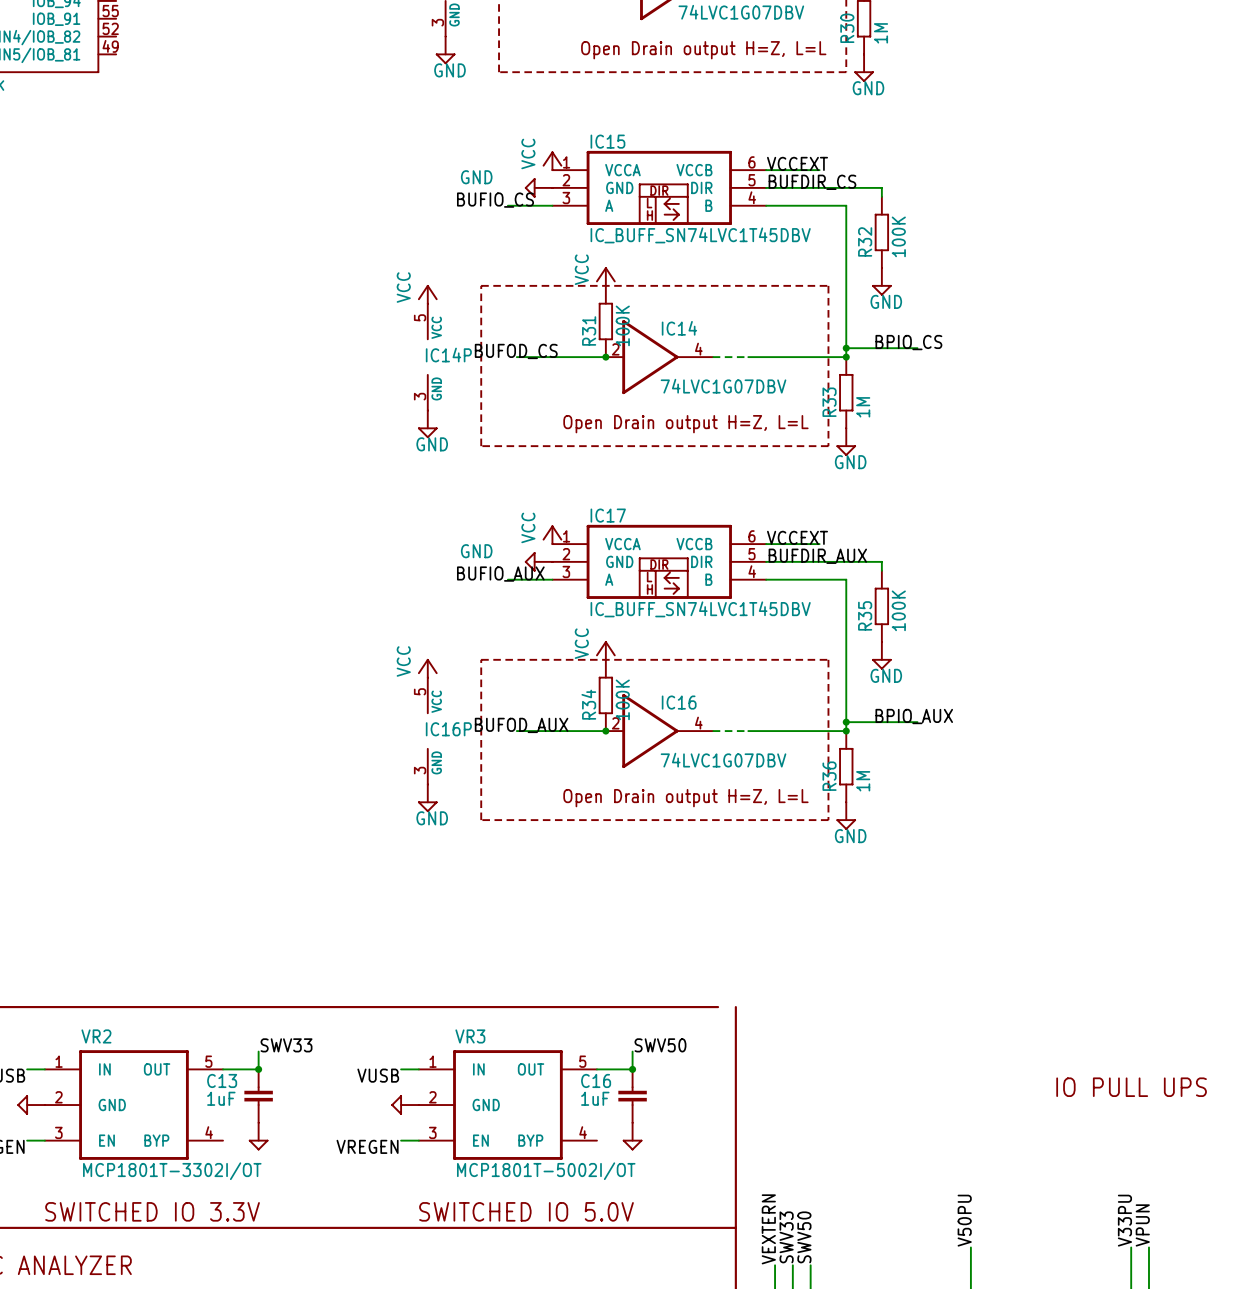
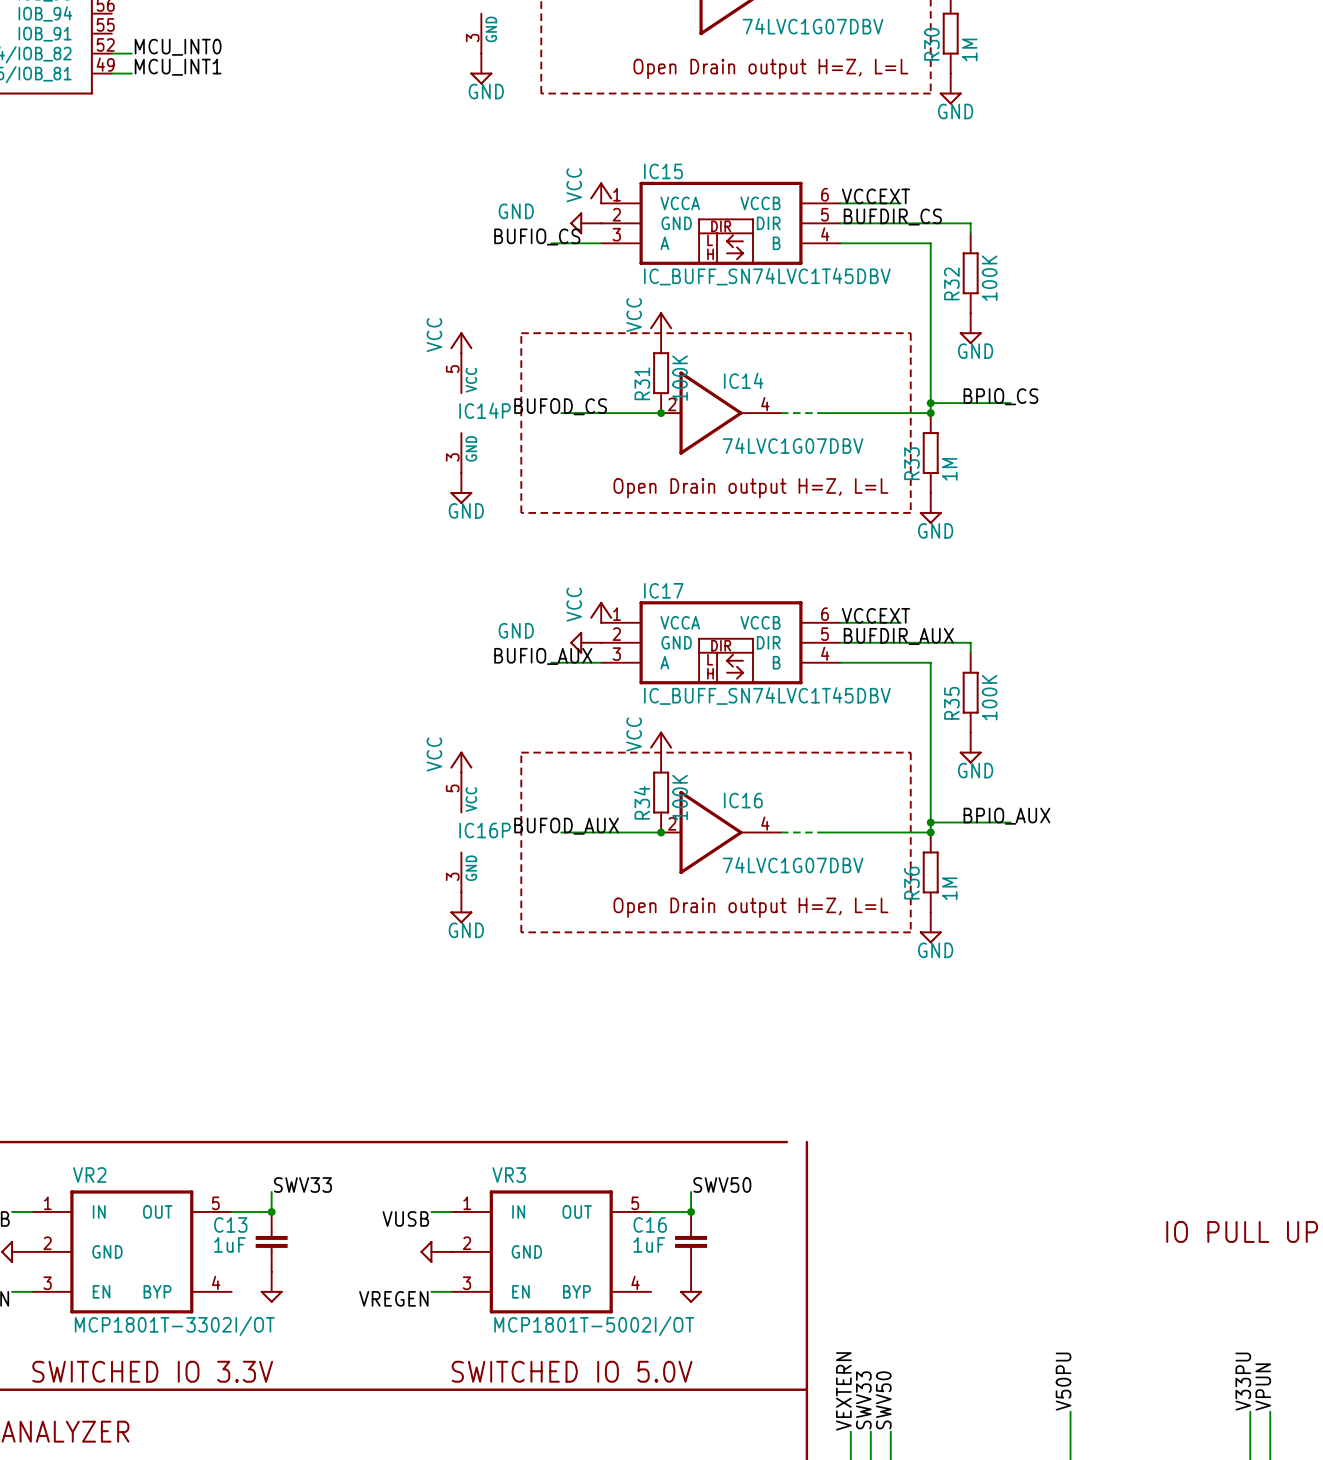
label: none -> MCU_INT0 (178, 47)
wire: none -> (111, 53) (131, 53)
label: none -> MCU_INT1 (178, 67)
wire: none -> (111, 73) (131, 73)

